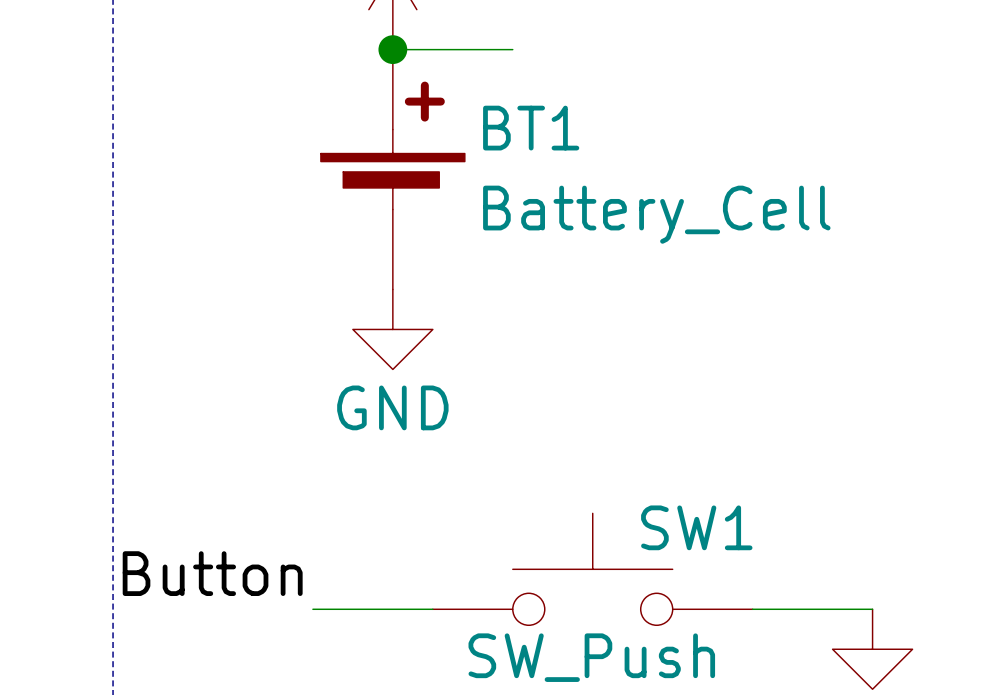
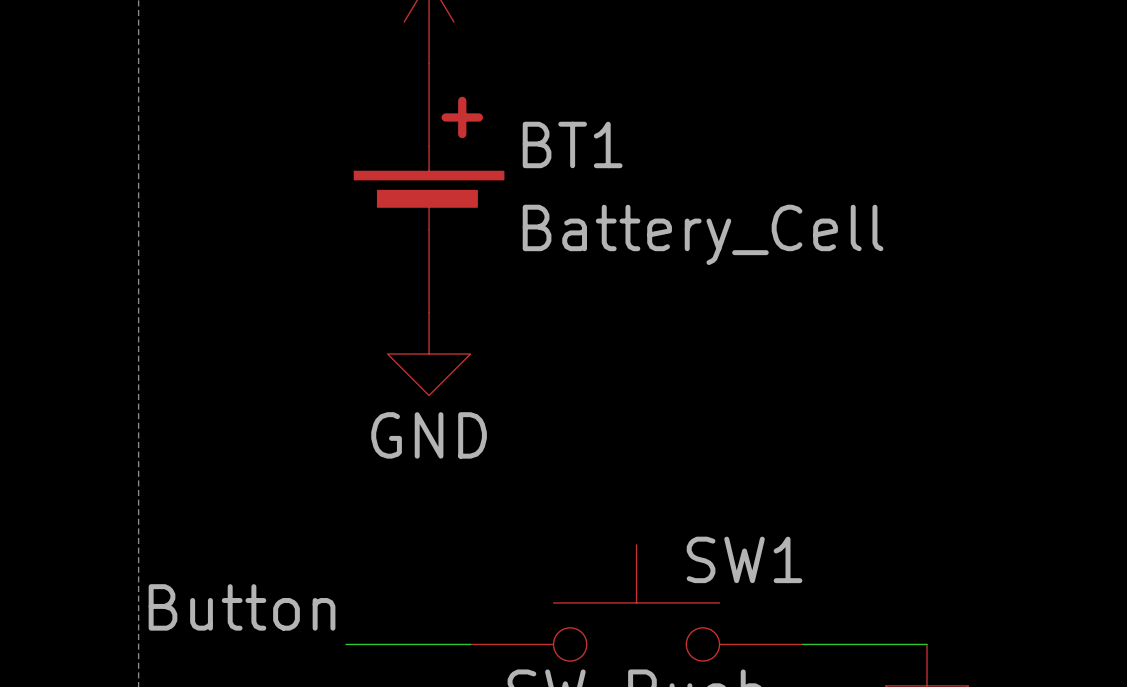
wire: (392, 49) (512, 49) -> none
junction: (392, 49) -> none

